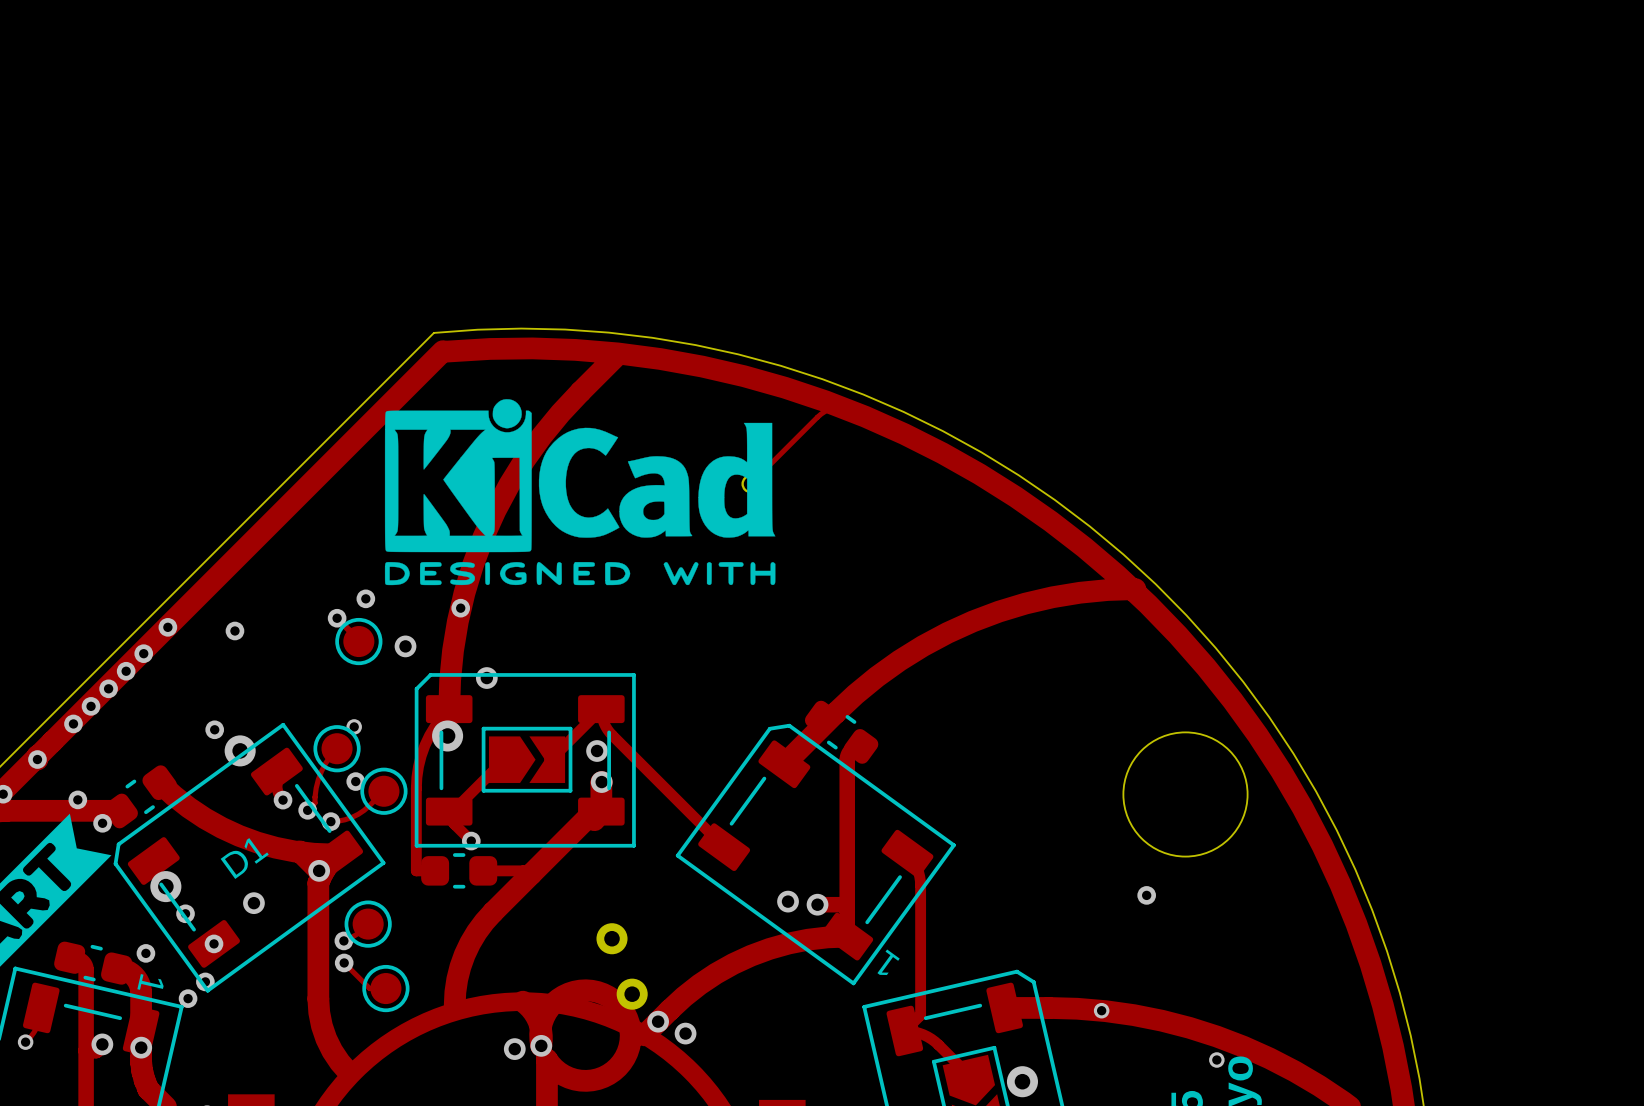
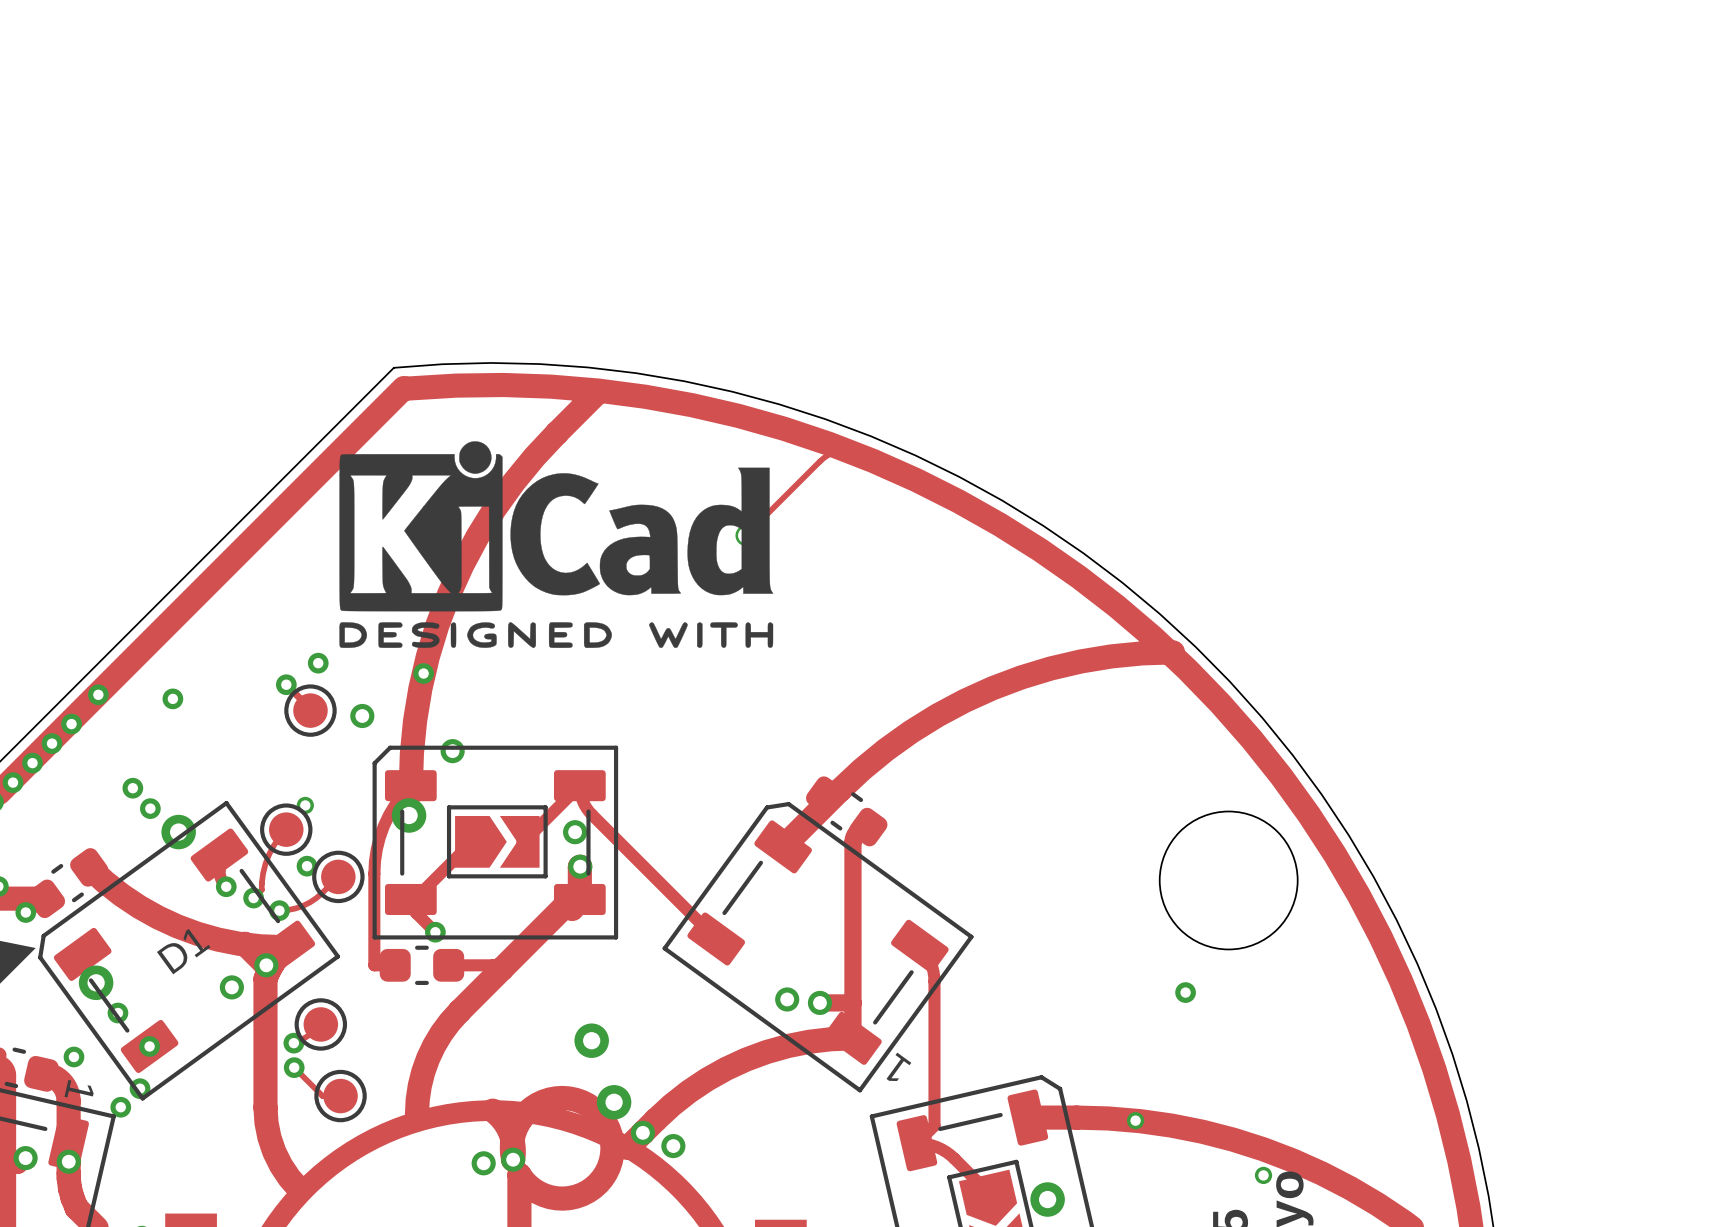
via: none -> (132, 788)
via position: (253, 903) -> (231, 987)

